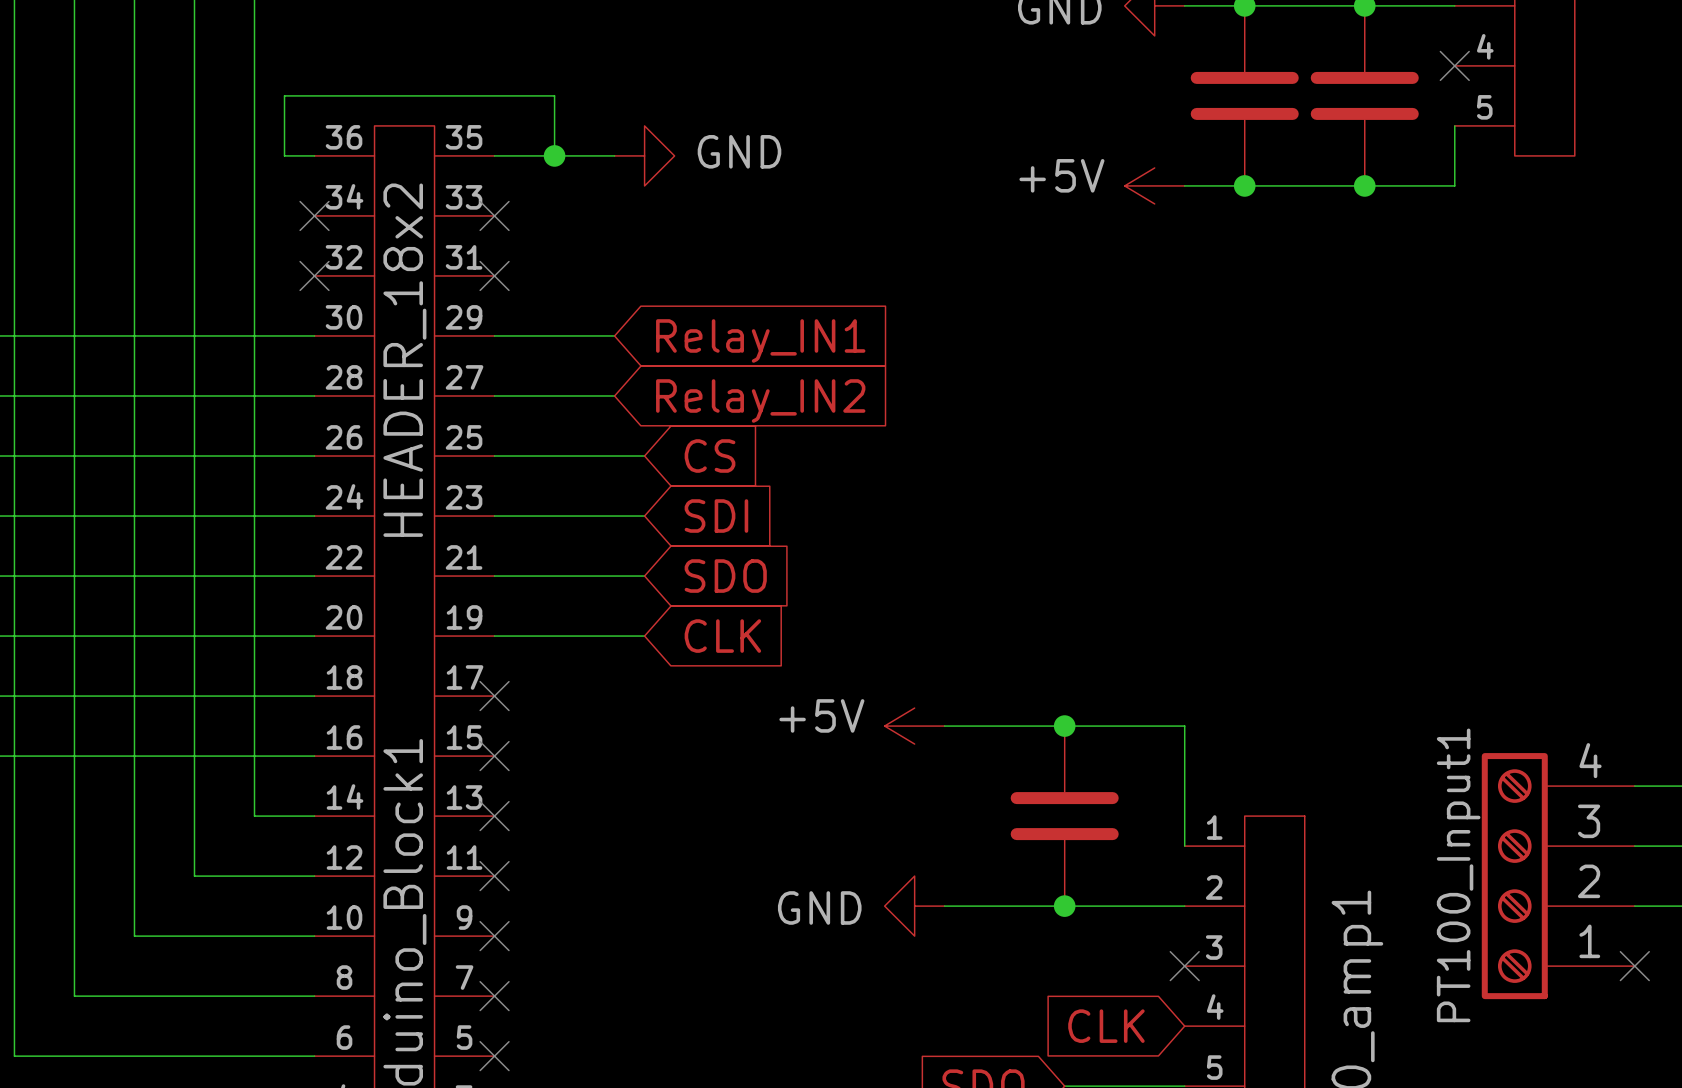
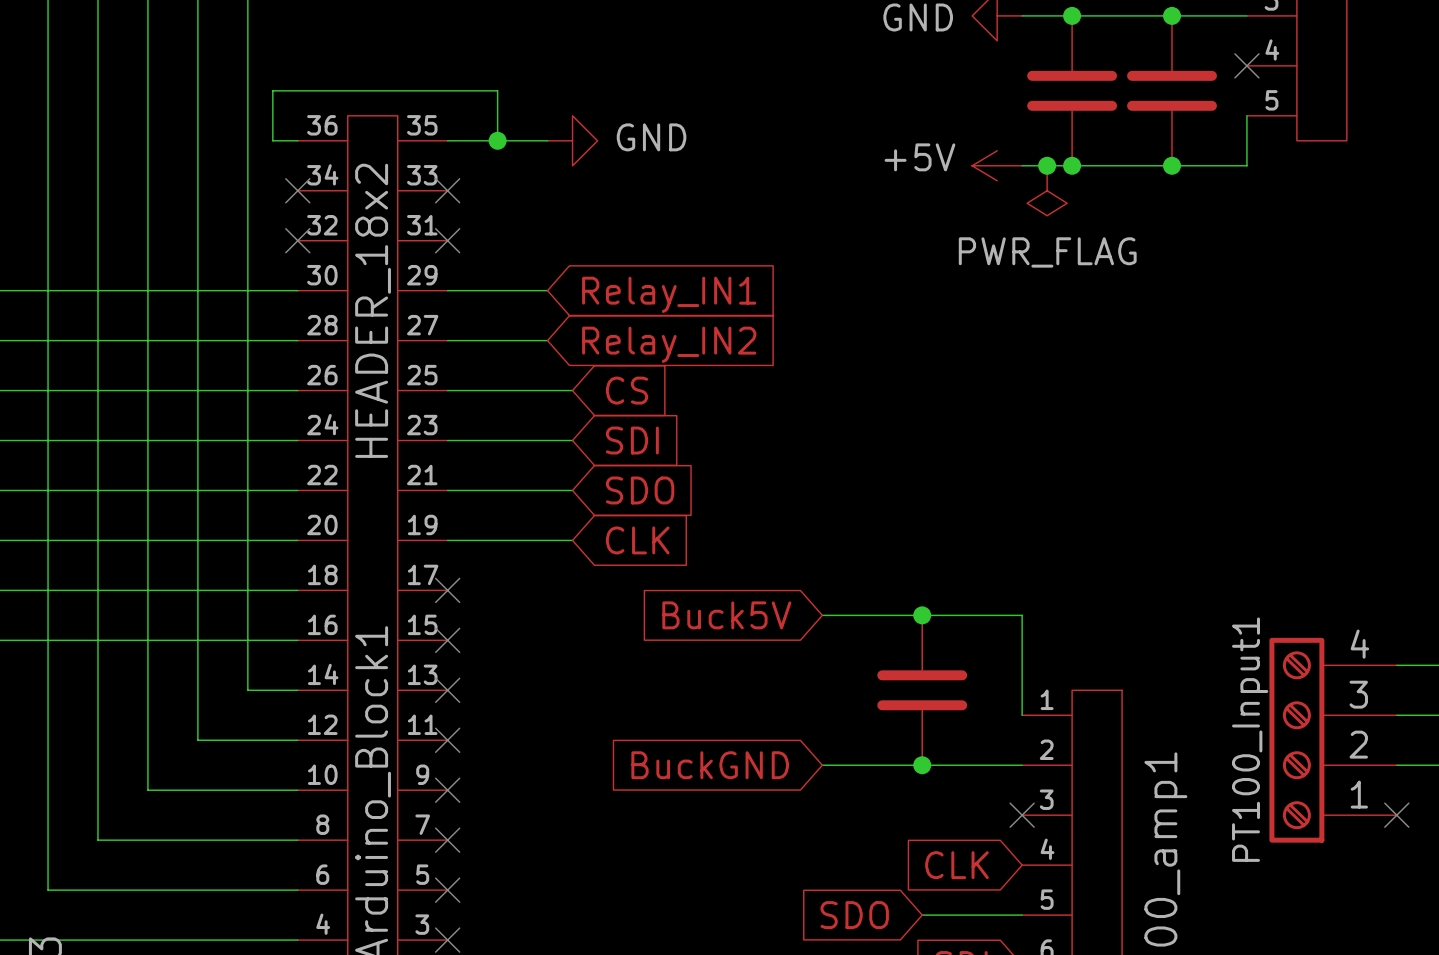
junction: none -> (1047, 165)
power symbol: none -> PWR_FLAG (1047, 190)
global label: none -> Buck5V (726, 615)
power symbol: +5V (914, 726) -> none
global label: none -> BuckGND (710, 765)
power symbol: GND (914, 906) -> none

